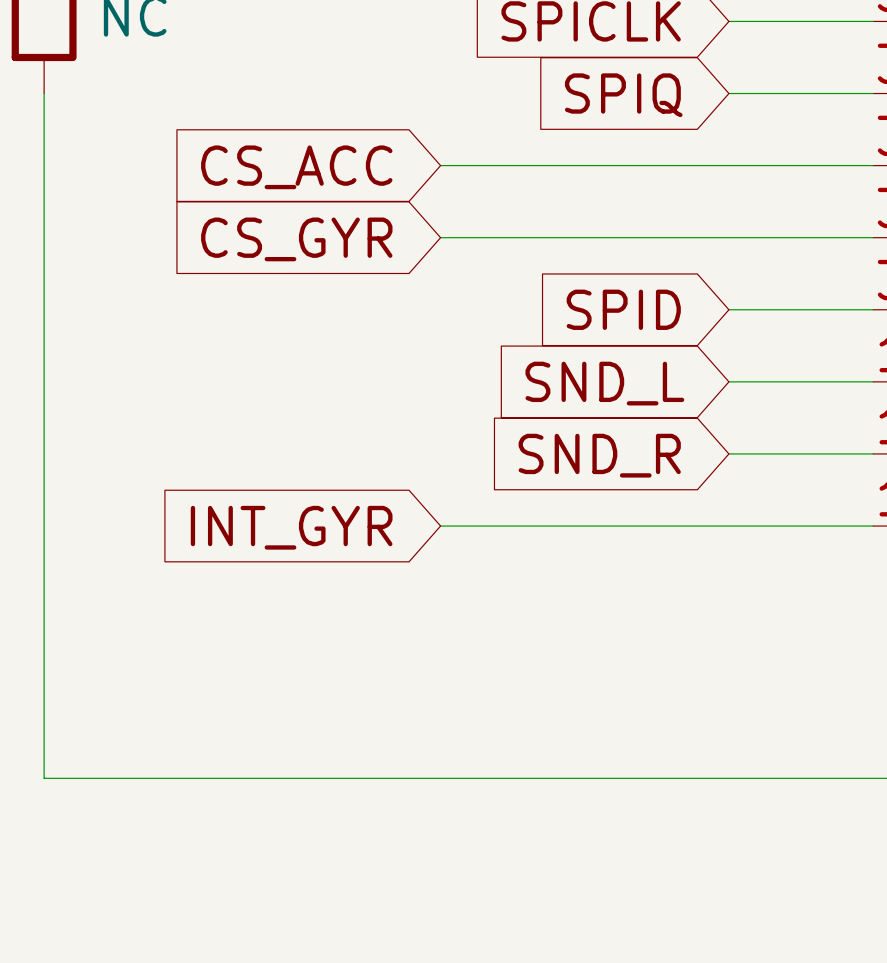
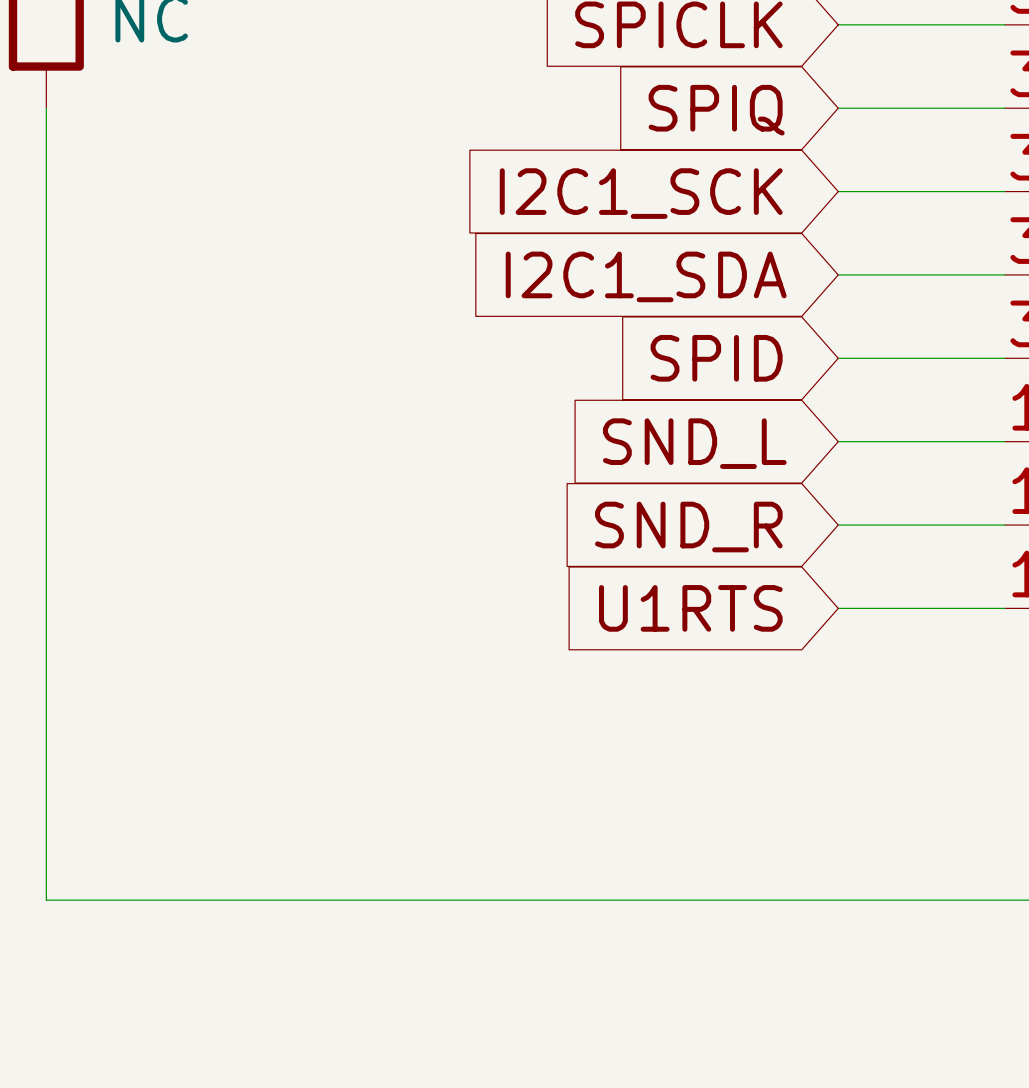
wire: (440, 165) (728, 165) -> none
global label: CS_ACC (296, 167) -> none
global label: none -> I2C1_SCK (641, 193)
wire: (440, 237) (728, 237) -> none
global label: CS_GYR (296, 239) -> none
global label: none -> I2C1_SDA (646, 276)
wire: (440, 526) (728, 526) -> none
global label: none -> U1RTS (690, 608)
global label: INT_GYR (291, 527) -> none

